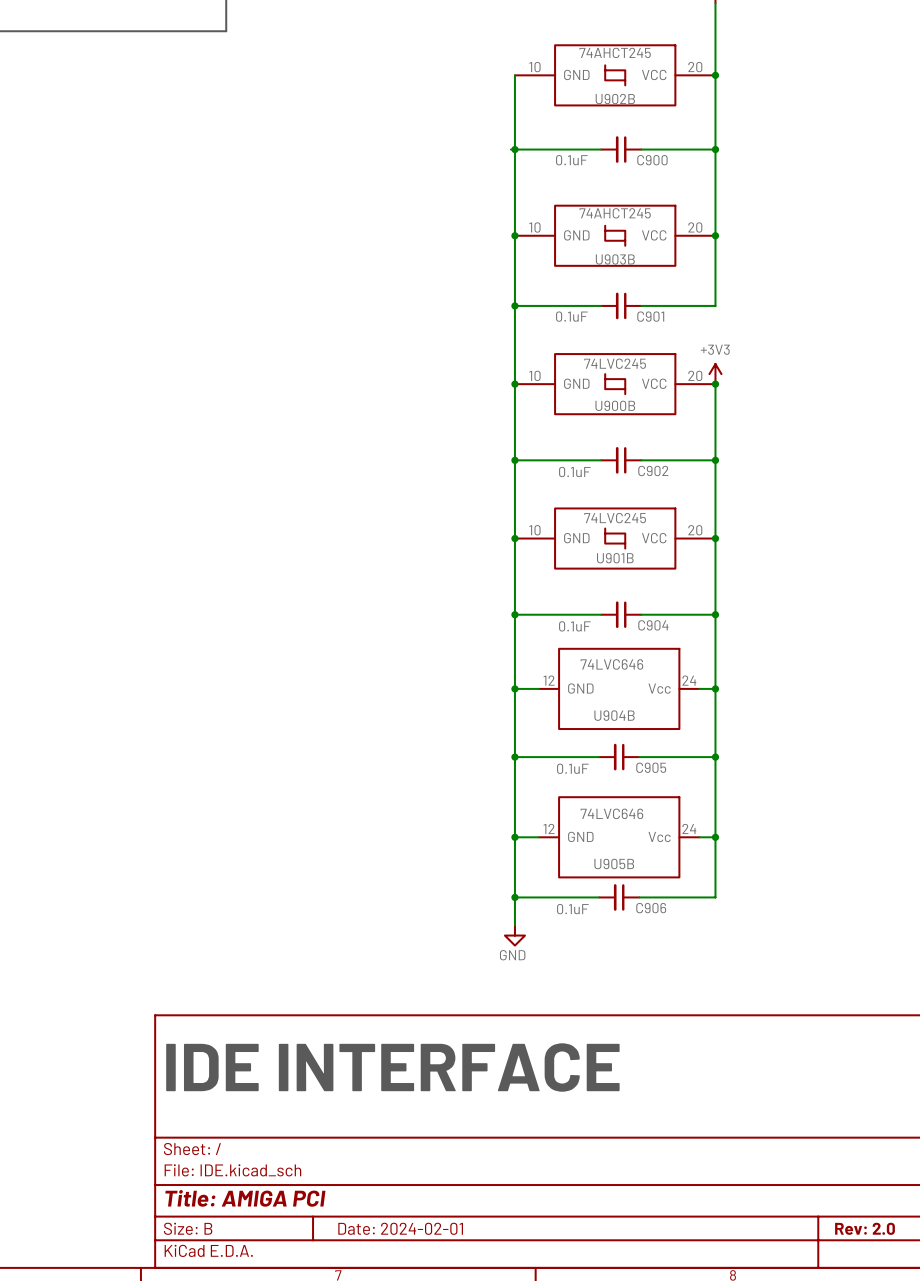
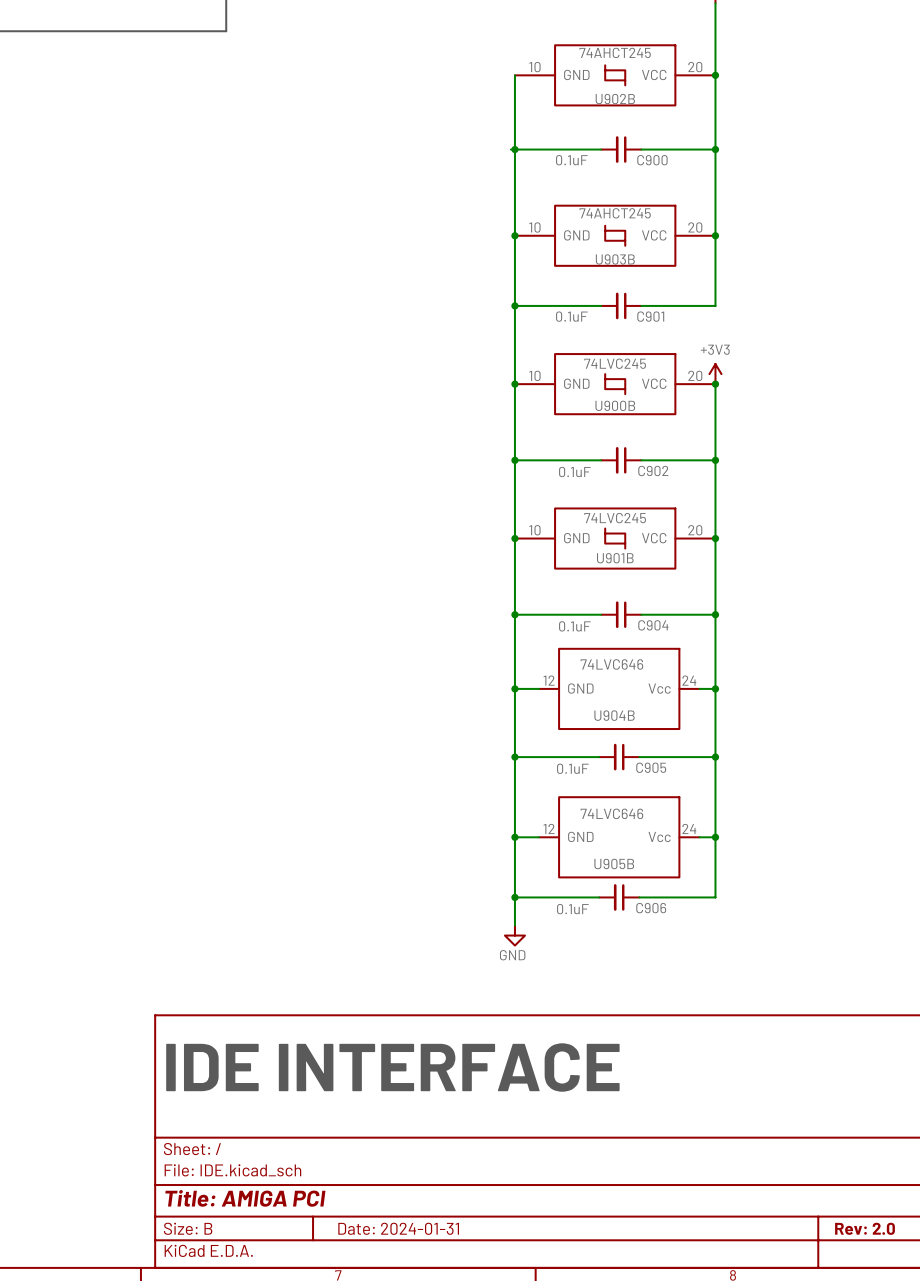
title block: Date: 2024-02-01 (400, 1228) -> Date: 2024-01-31 (398, 1228)

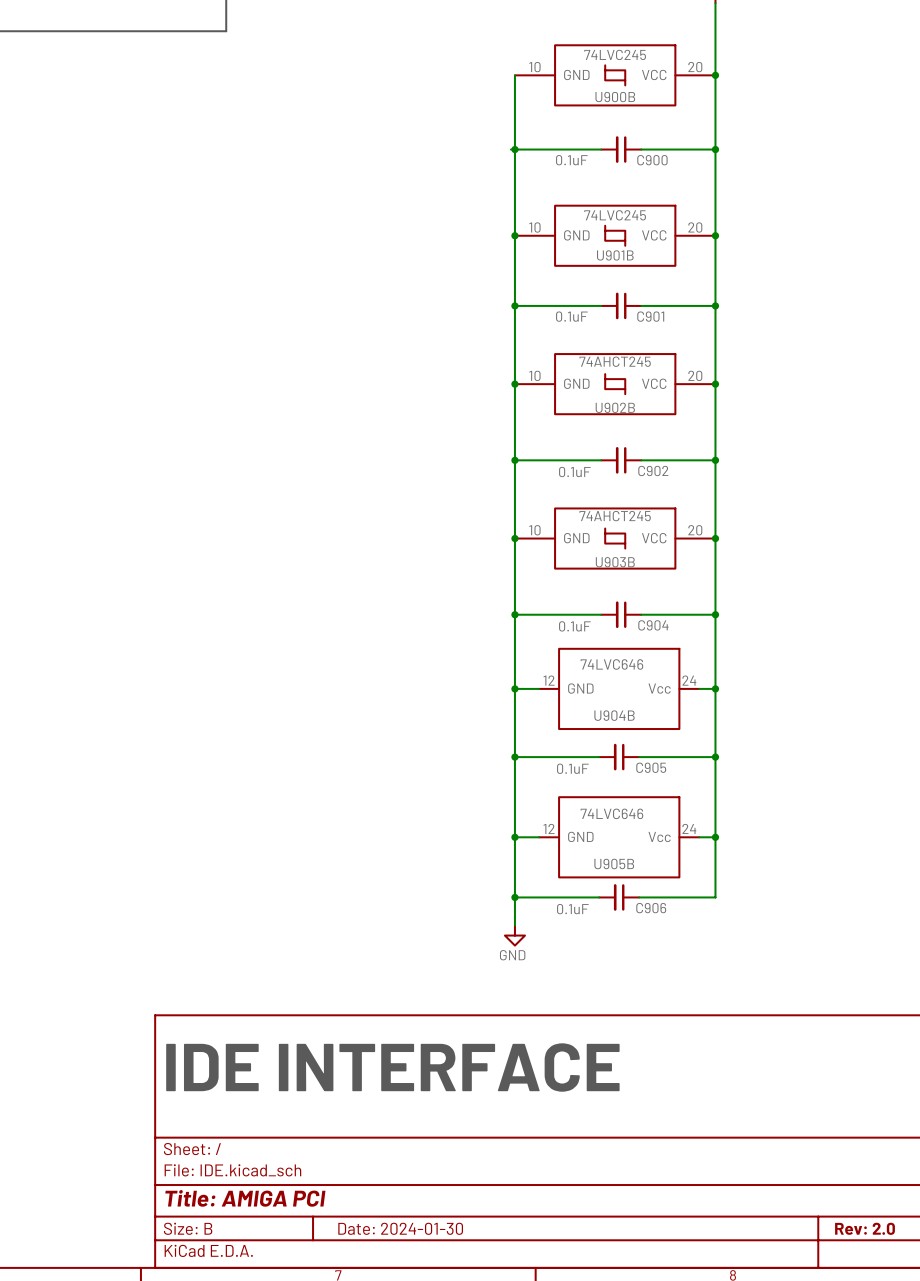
U902B value: 74AHCT245 (615, 52) -> 74LVC245 (615, 54)
U902B name: U902B (615, 99) -> U900B (615, 97)
U903B value: 74AHCT245 (615, 213) -> 74LVC245 (615, 215)
U903B name: U903B (615, 259) -> U901B (615, 255)
wire: none -> (715, 305) (715, 384)
junction: none -> (715, 305)
U900B value: 74LVC245 (615, 363) -> 74AHCT245 (615, 361)
power symbol: +3V3 (715, 374) -> none
U900B name: U900B (615, 405) -> U902B (615, 407)
U901B value: 74LVC245 (615, 518) -> 74AHCT245 (615, 516)
U901B name: U901B (615, 558) -> U903B (615, 562)
title block: Date: 2024-01-31 (398, 1228) -> Date: 2024-01-30 (400, 1228)

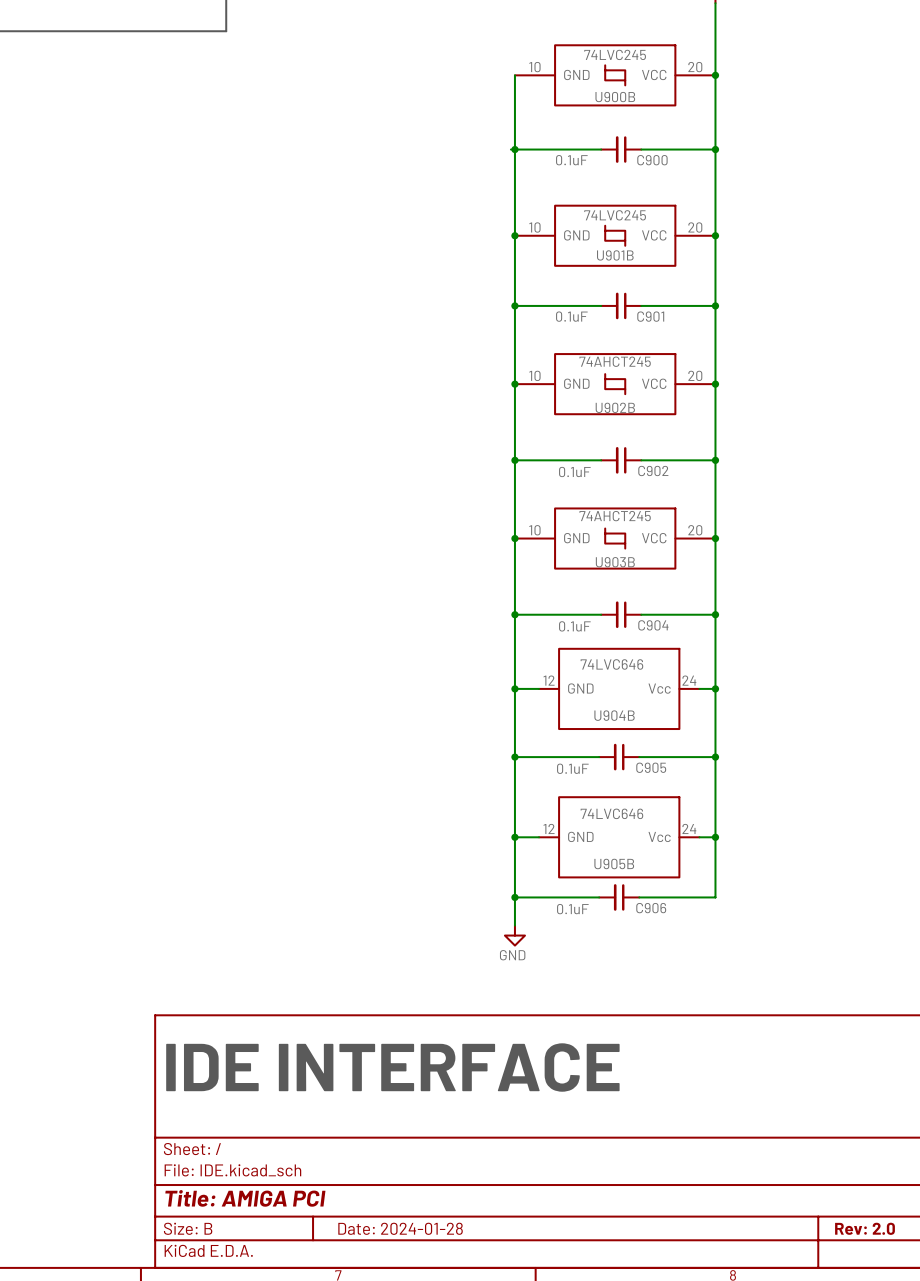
title block: Date: 2024-01-30 (400, 1228) -> Date: 2024-01-28 (400, 1228)

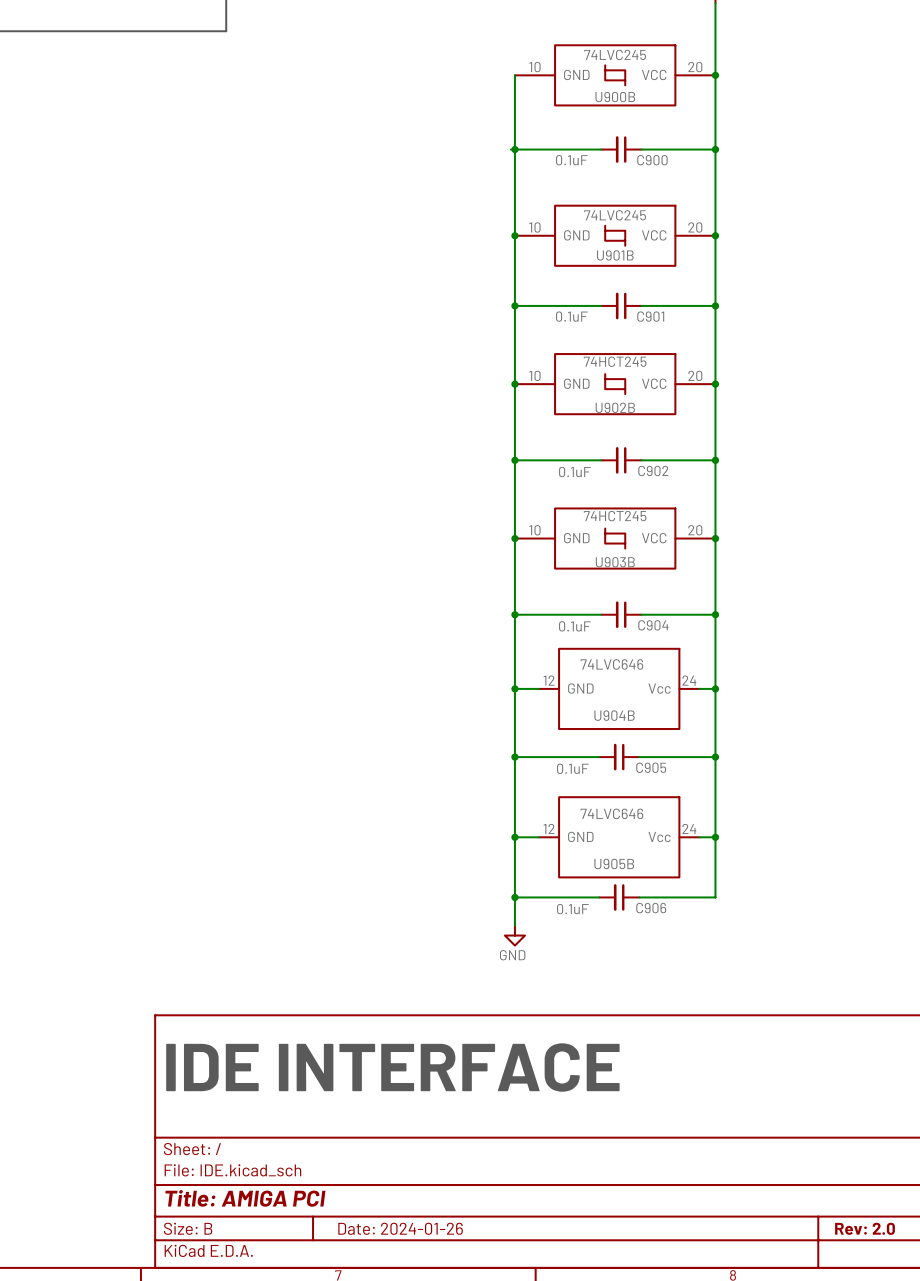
U902B value: 74AHCT245 (615, 361) -> 74HCT245 (615, 361)
U903B value: 74AHCT245 (615, 516) -> 74HCT245 (615, 516)
title block: Date: 2024-01-28 (400, 1228) -> Date: 2024-01-26 (400, 1228)

